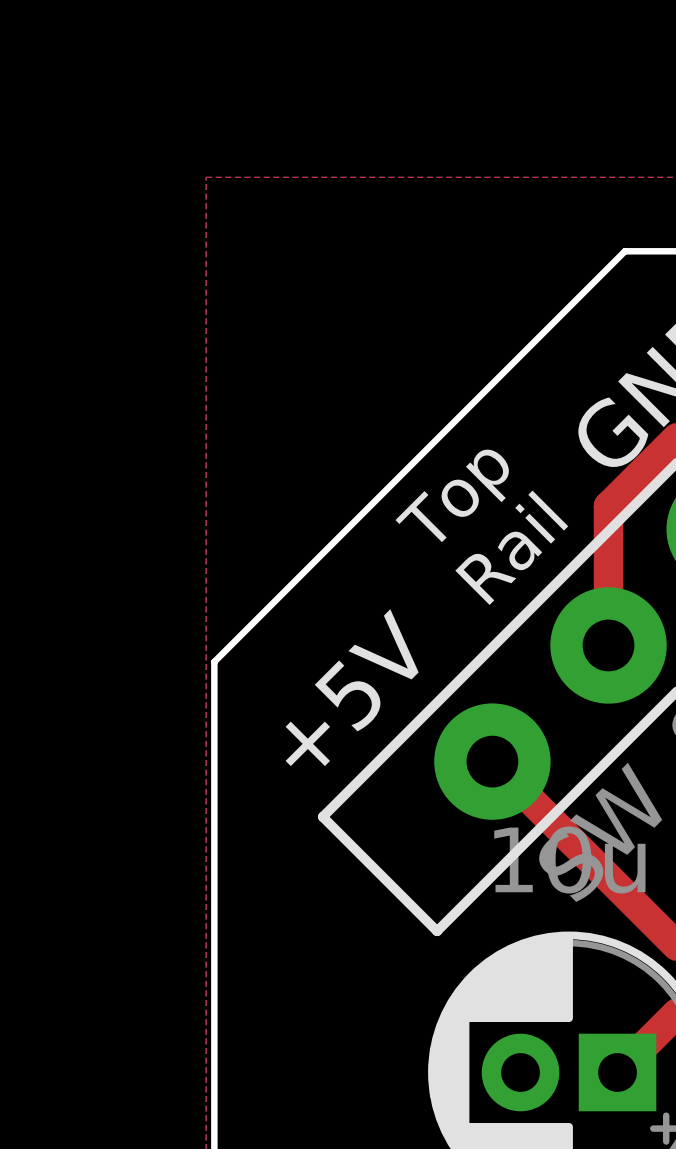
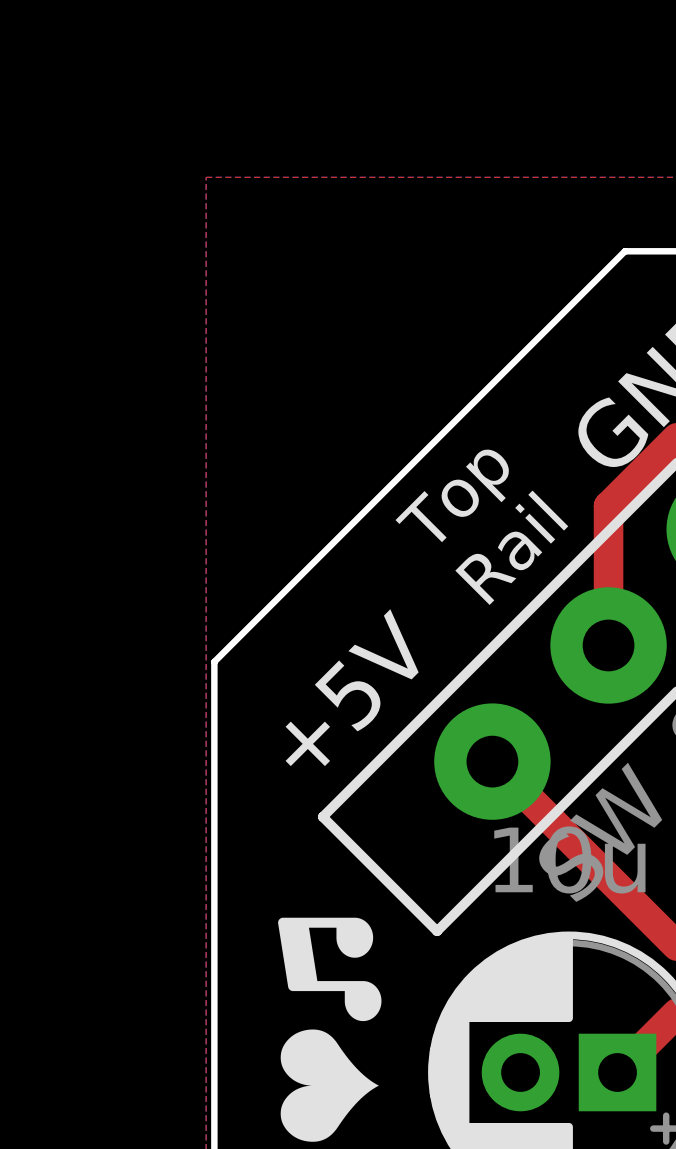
drawing: none -> [278, 917, 382, 1142]

